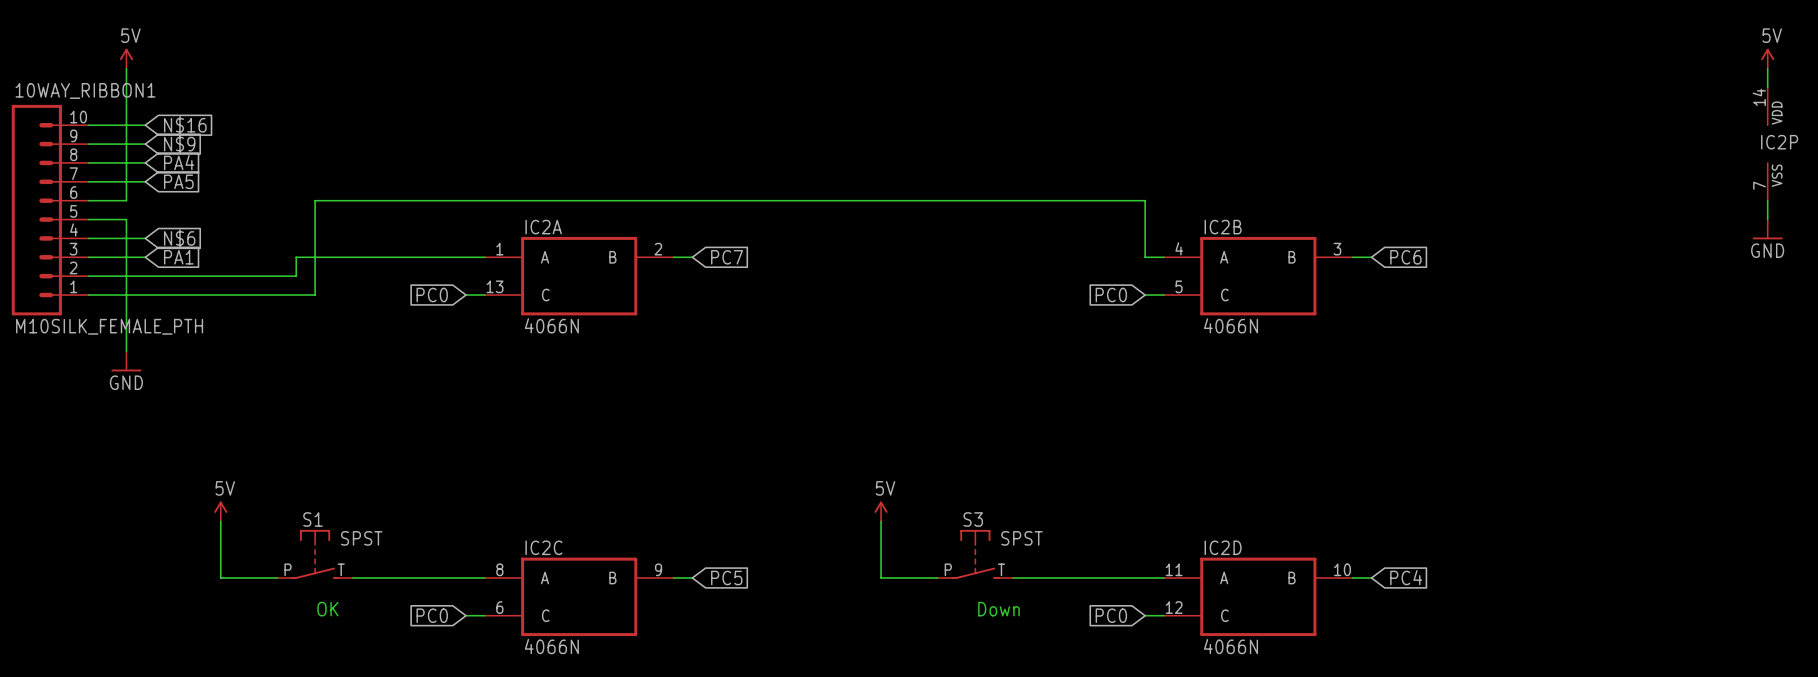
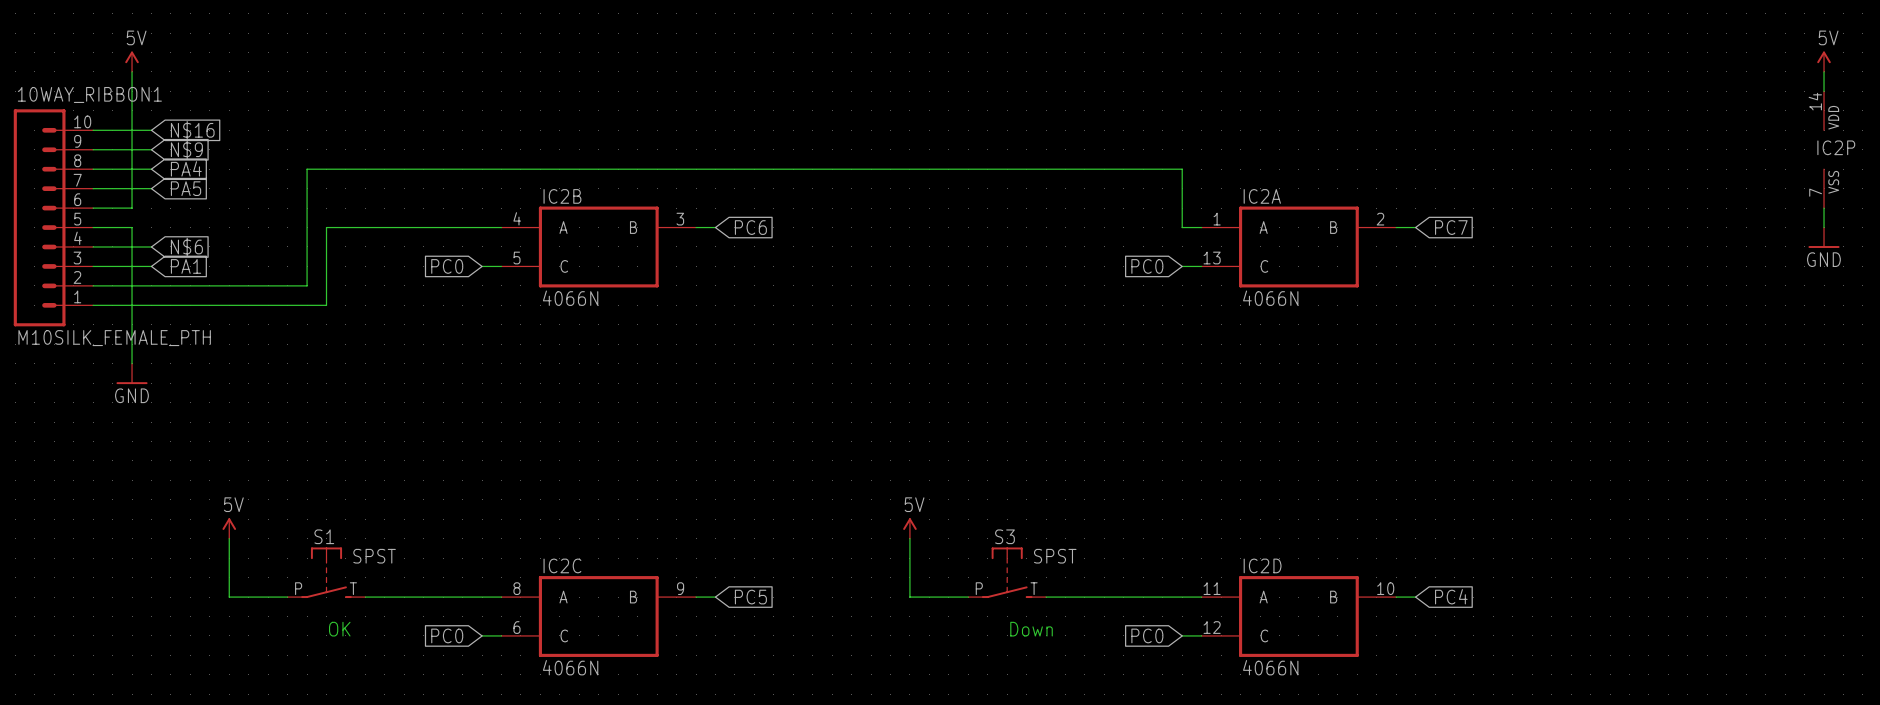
wire: (1145, 200) (315, 200) (315, 219) -> (1182, 208) (1182, 169) (307, 169) (307, 266)
global label: none -> PC6 (750, 227)
wire: (1145, 219) (1145, 257) -> (1182, 227) (1201, 227)
global label: none -> PC7 (1451, 227)
wire: (296, 257) (466, 257) -> (326, 227) (501, 227)
wire: (673, 257) (692, 257) -> (696, 227) (715, 227)
global label: PC7 (727, 257) -> none
wire: (1352, 257) (1371, 257) -> (1396, 227) (1415, 227)
global label: PC6 (1405, 257) -> none
IC2A position: (579, 276) -> (1298, 246)
IC2B position: (1258, 276) -> (598, 246)
global label position: PC0 (432, 295) -> PC0 (447, 266)
wire: (466, 295) (484, 295) -> none
global label position: PC0 (1111, 295) -> PC0 (1147, 266)
wire: (1145, 295) (1164, 295) -> none

